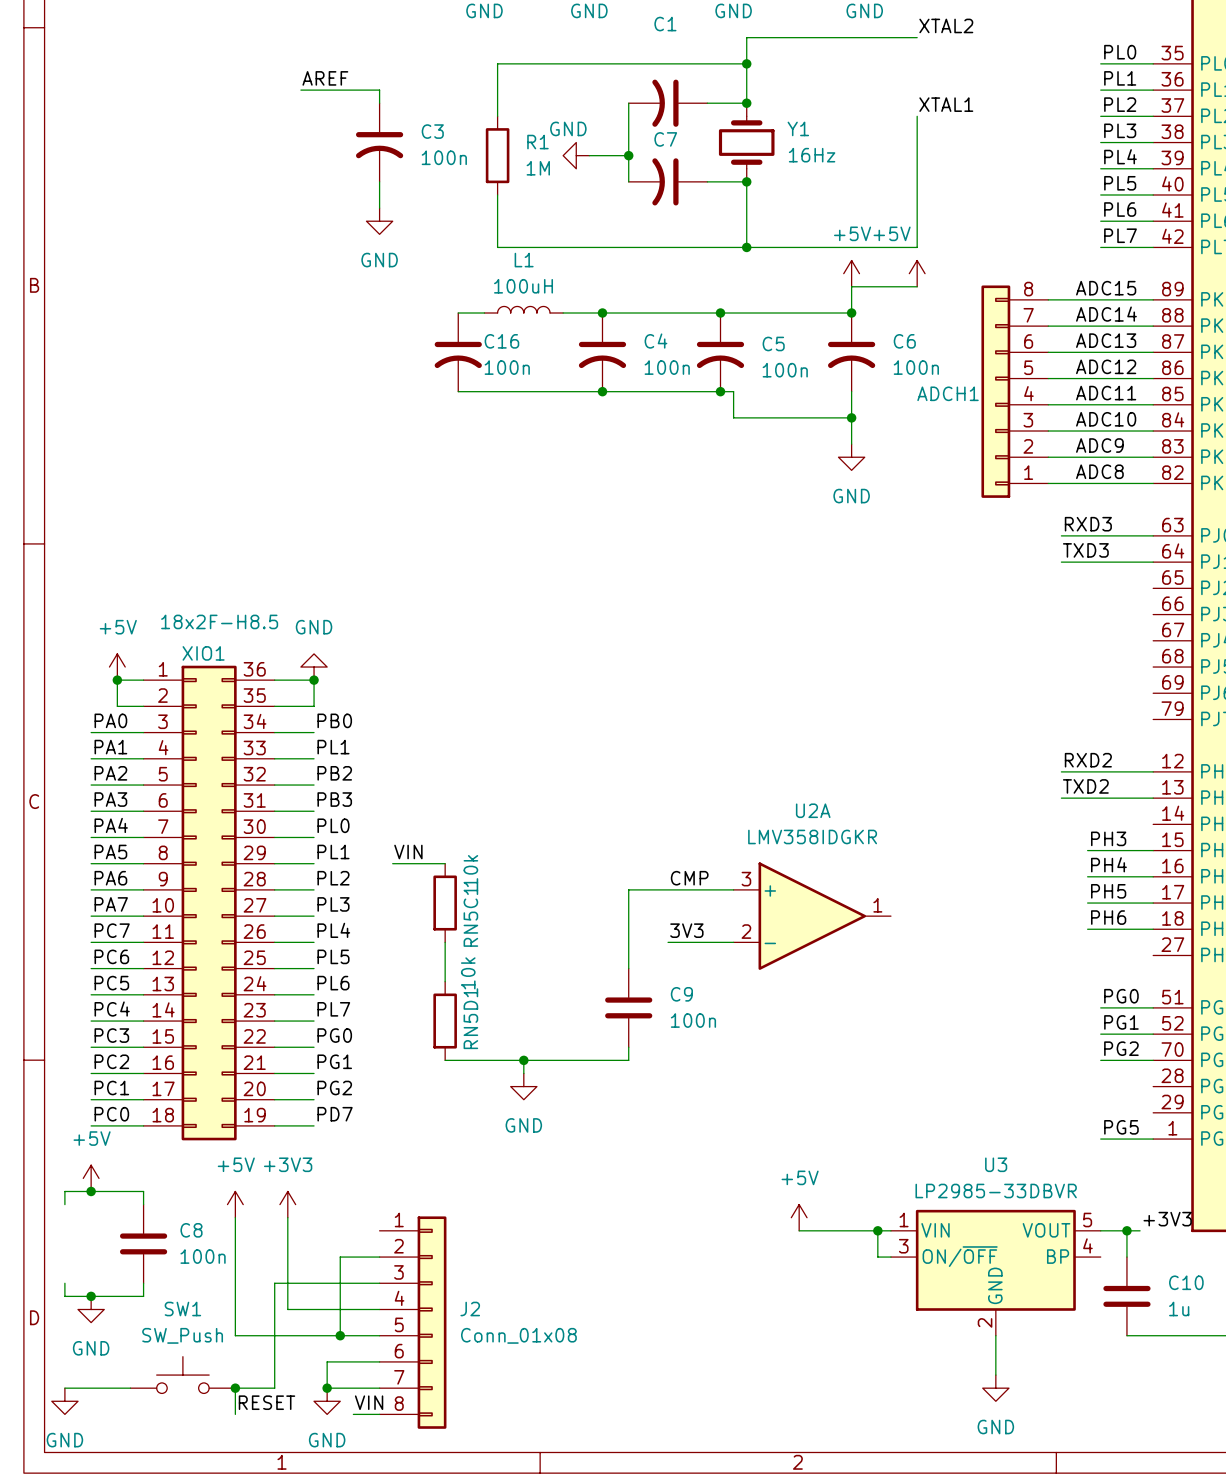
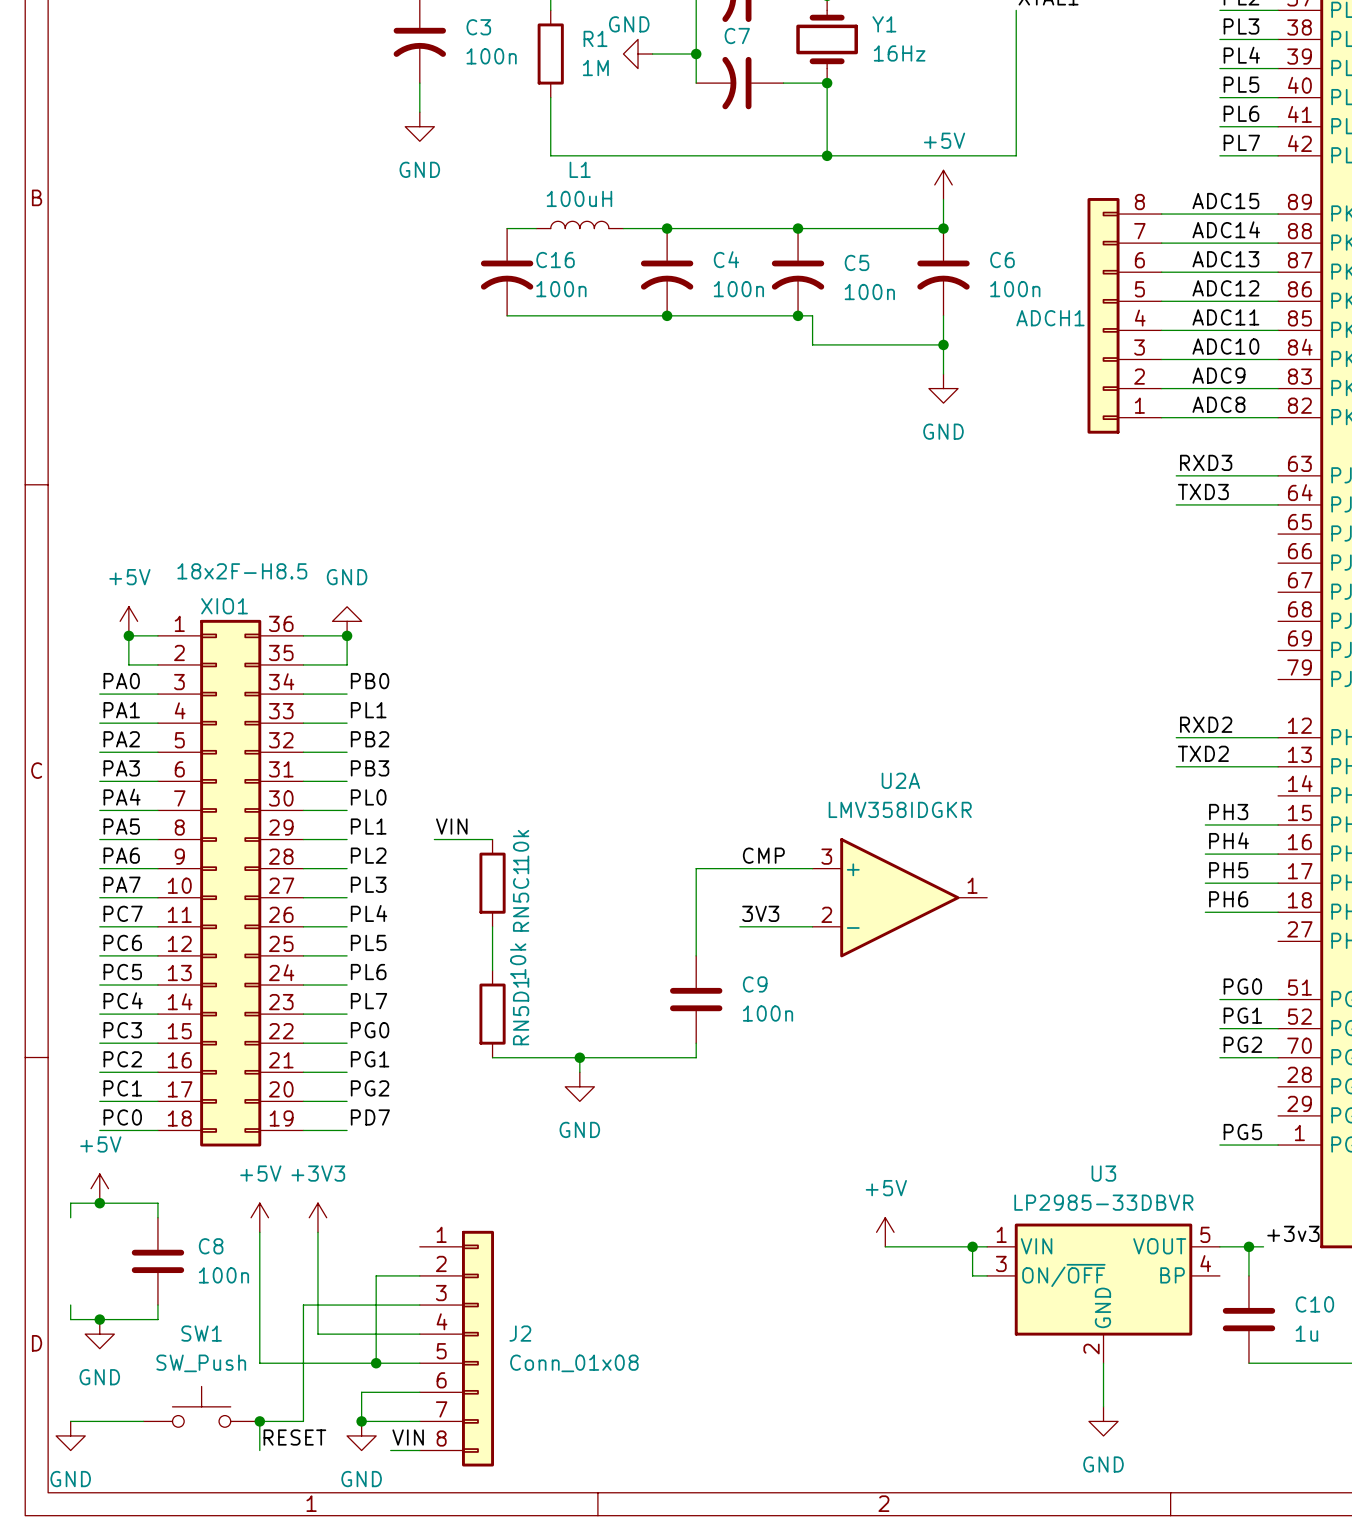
power symbol: +5V (917, 273) -> none
wire: (851, 286) (917, 286) -> none
label: +3V3 (1167, 1219) -> +3v3 (1293, 1233)

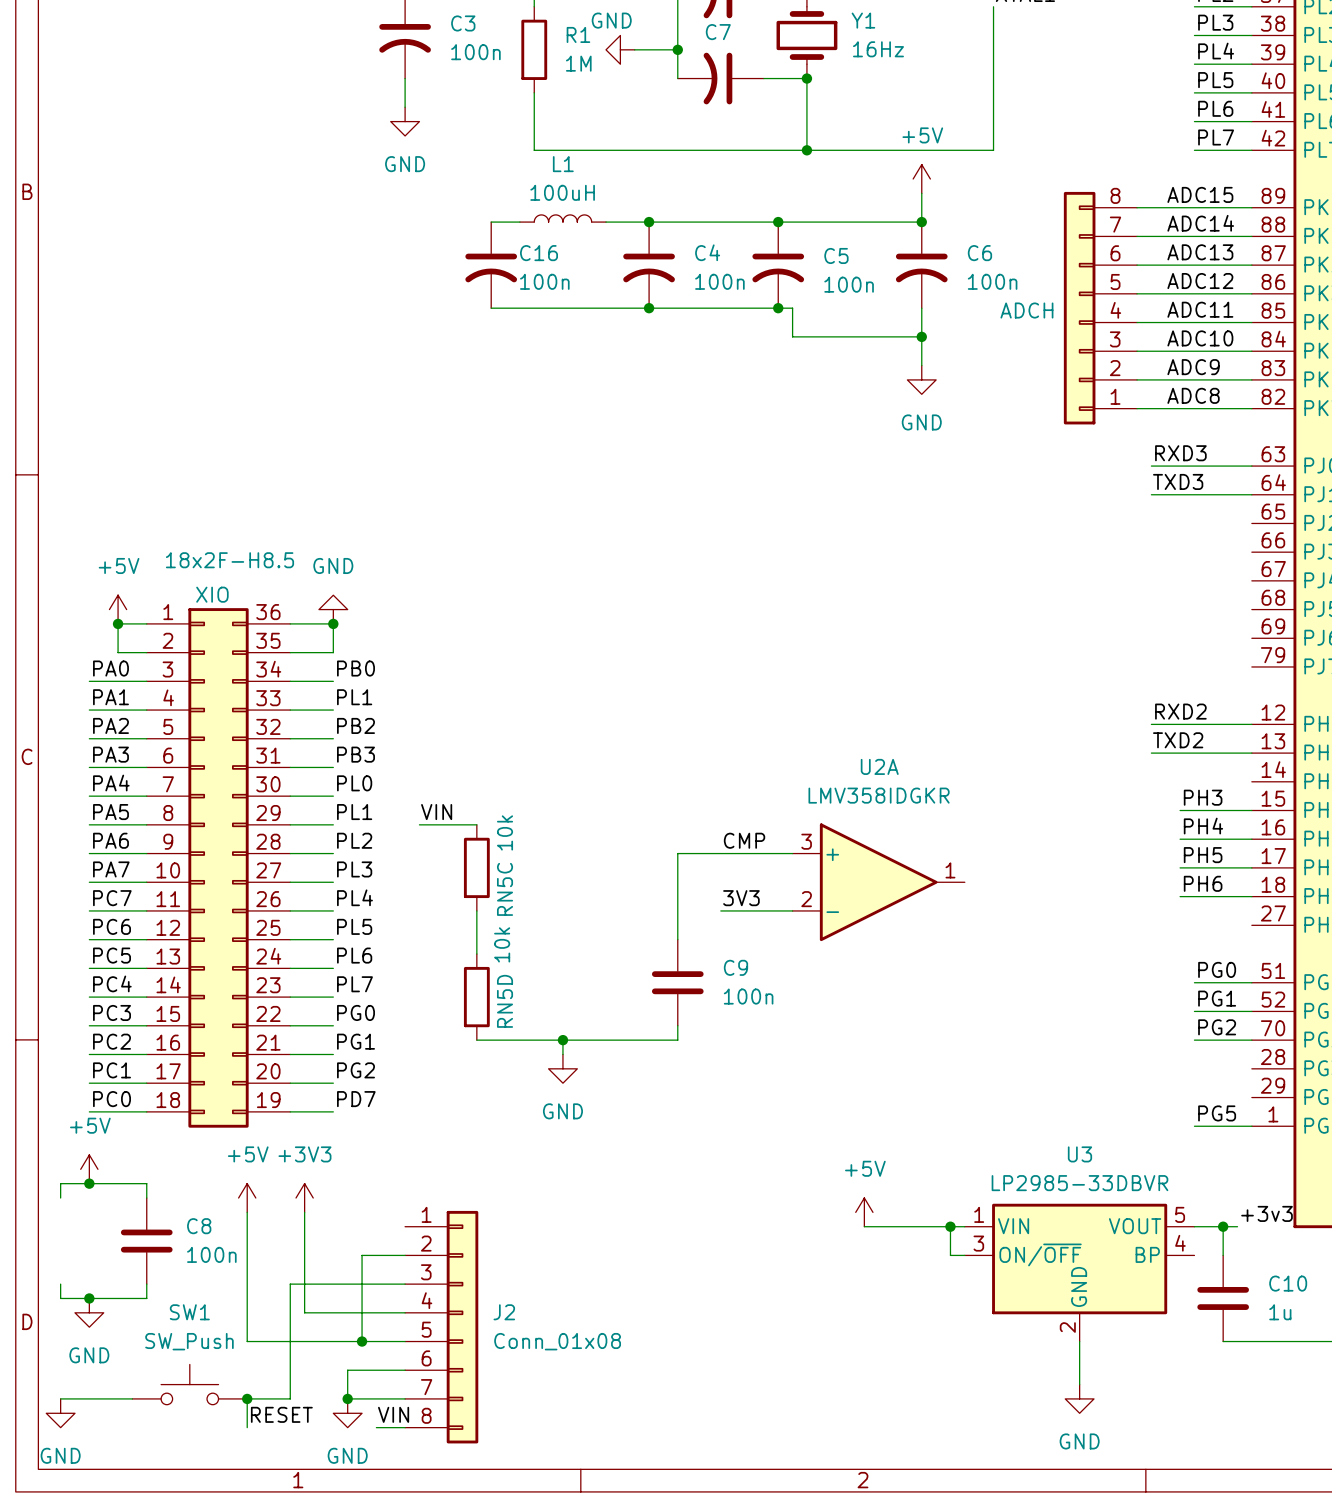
ADCH1 name: ADCH1 (1050, 318) -> ADCH (1026, 310)
XIO1 name: XIO1 (224, 606) -> XIO (212, 594)
RN5C1 name: RN5C1 (521, 898) -> RN5C (505, 889)
RN5D1 name: RN5D1 (521, 1011) -> RN5D (505, 1001)

